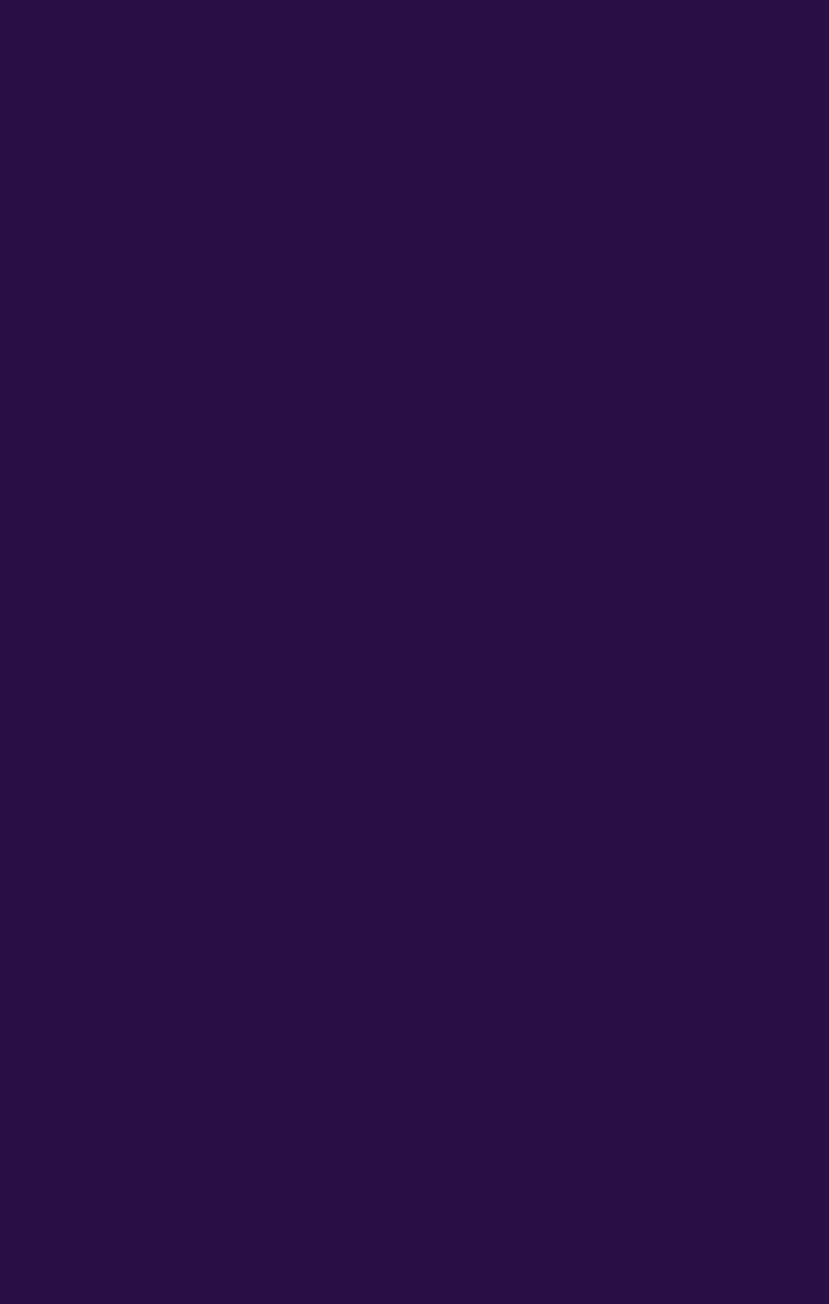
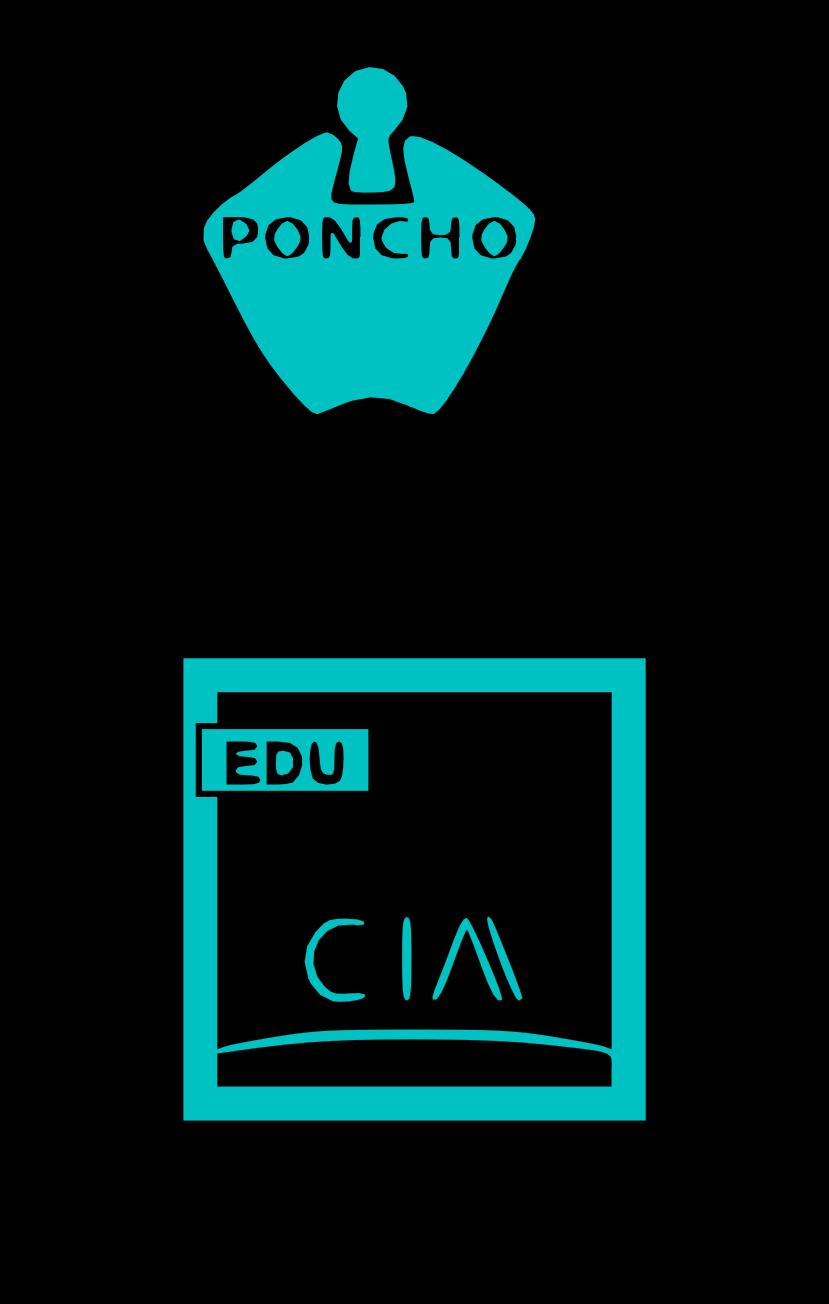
drawing: none -> [203, 67, 536, 415]
drawing: none -> [183, 658, 646, 1121]

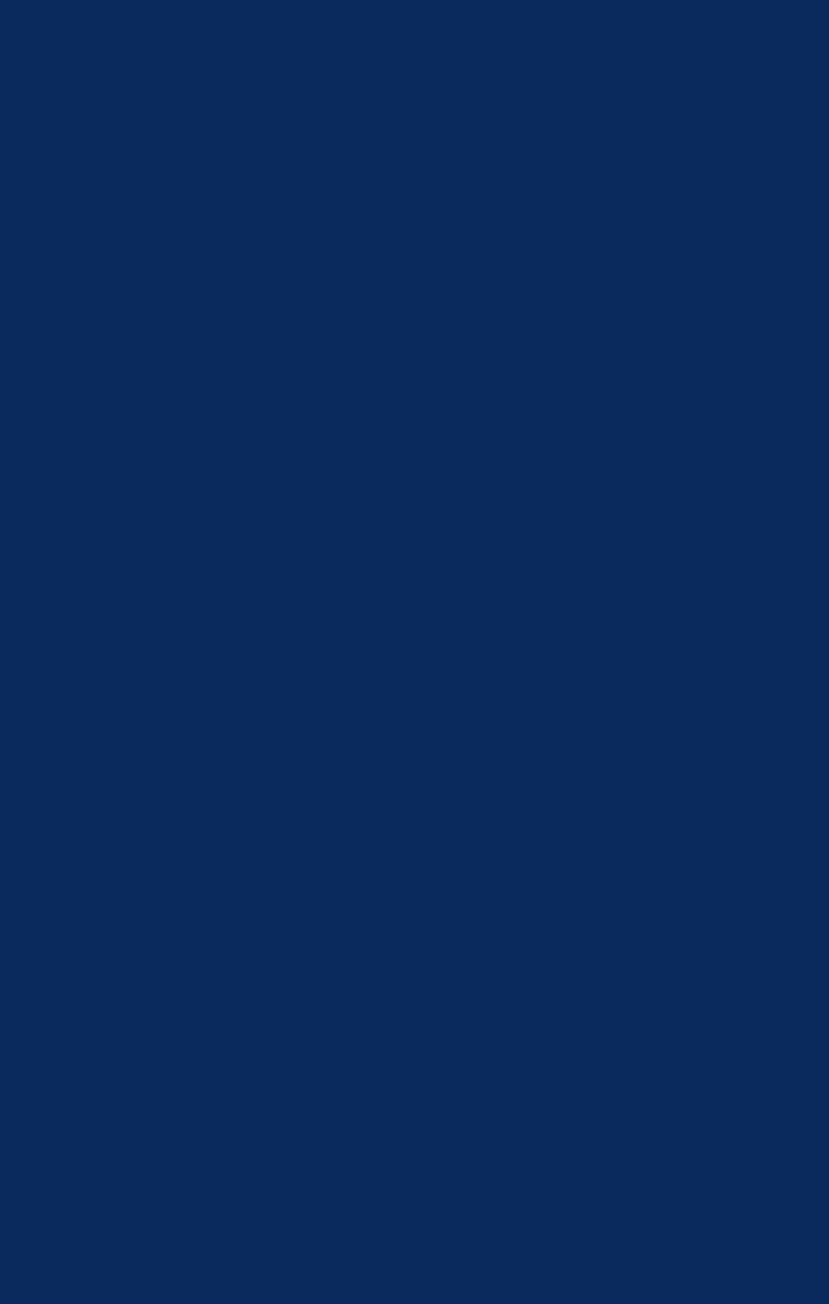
drawing: [203, 67, 536, 415] -> none
drawing: [183, 658, 646, 1121] -> none

